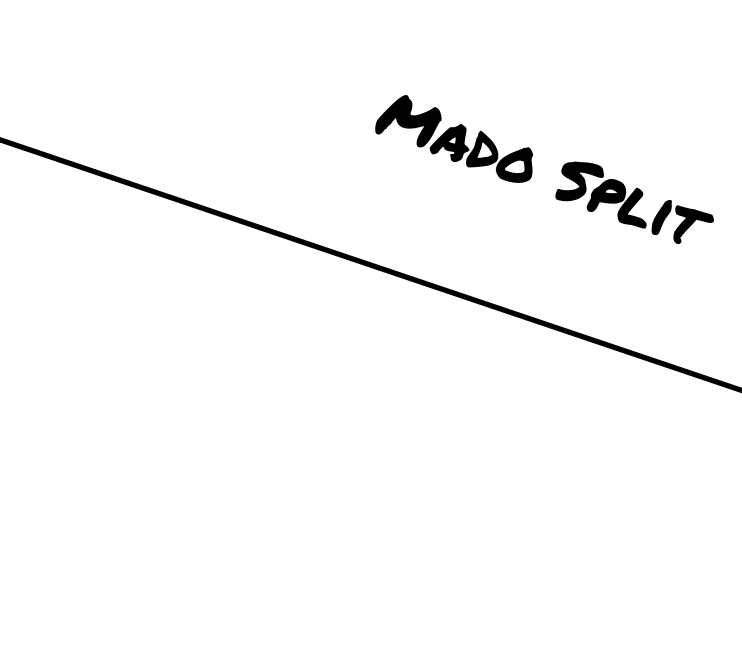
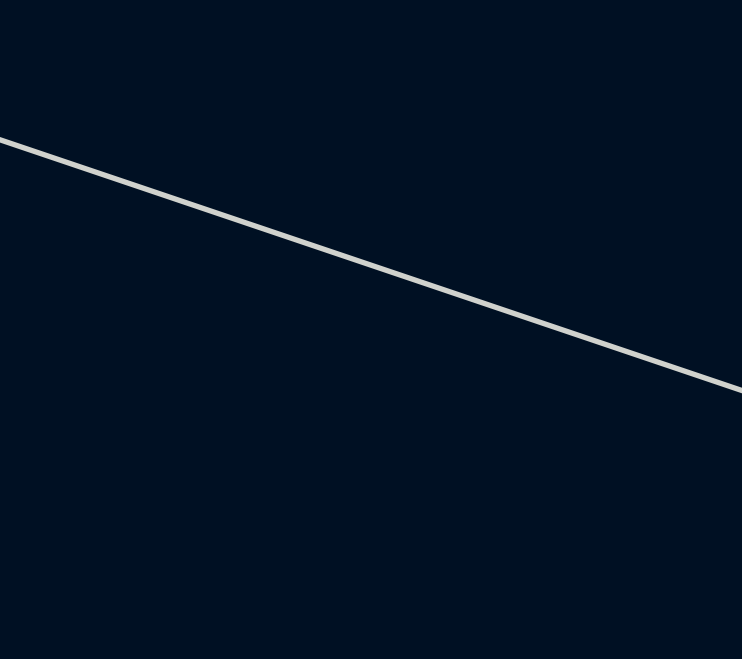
drawing: [375, 95, 714, 245] -> none

